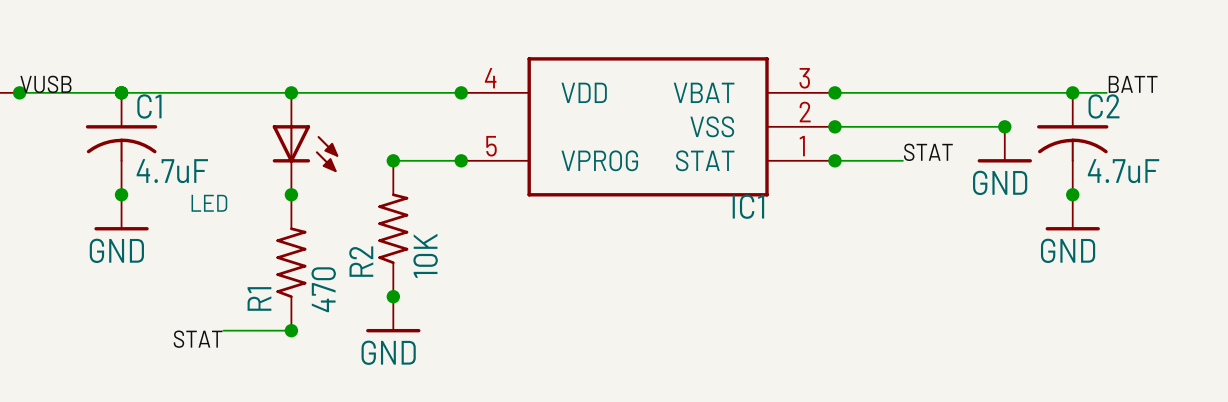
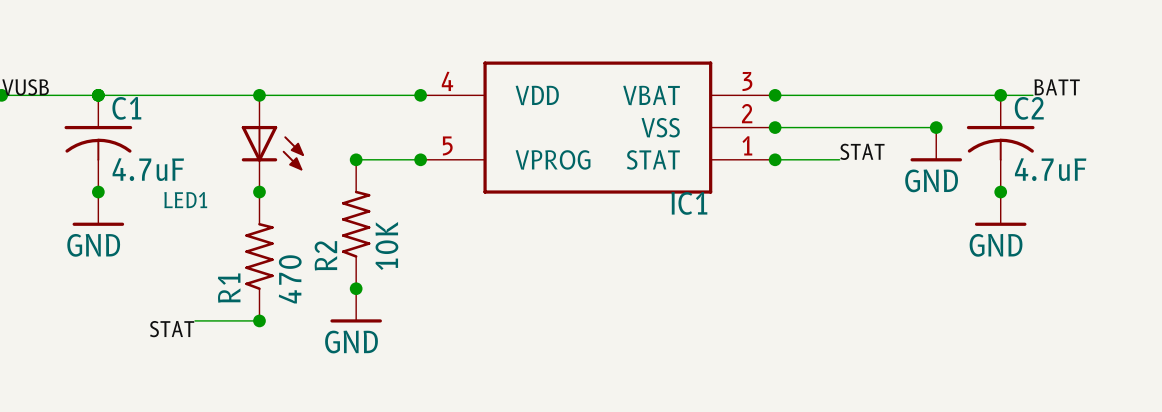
LED name: LED (209, 203) -> LED1 (185, 200)

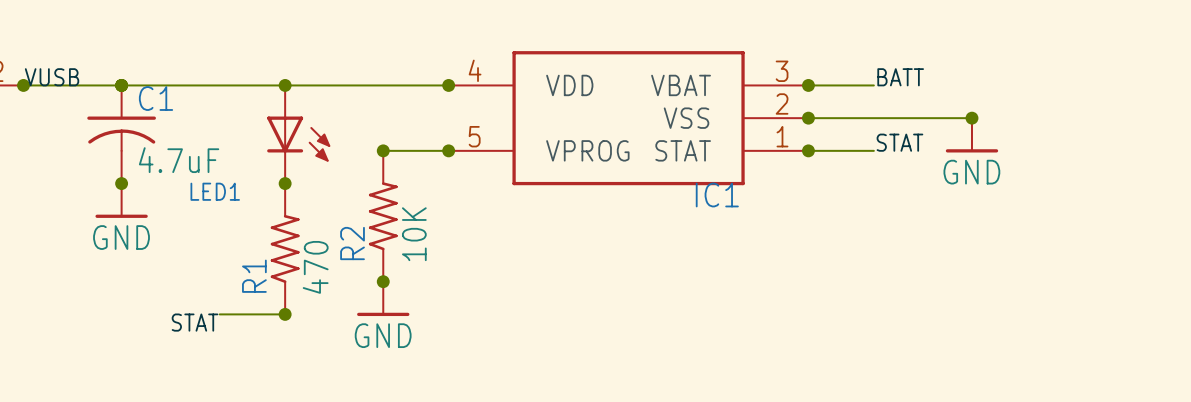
label position: BATT (1057, 87) -> BATT (900, 77)
wire: (839, 95) (1032, 95) -> none
junction: (1000, 95) -> none
C2: 4.7uF (1000, 143) -> none
junction: (1000, 192) -> none
power symbol: GND (1000, 208) -> none

